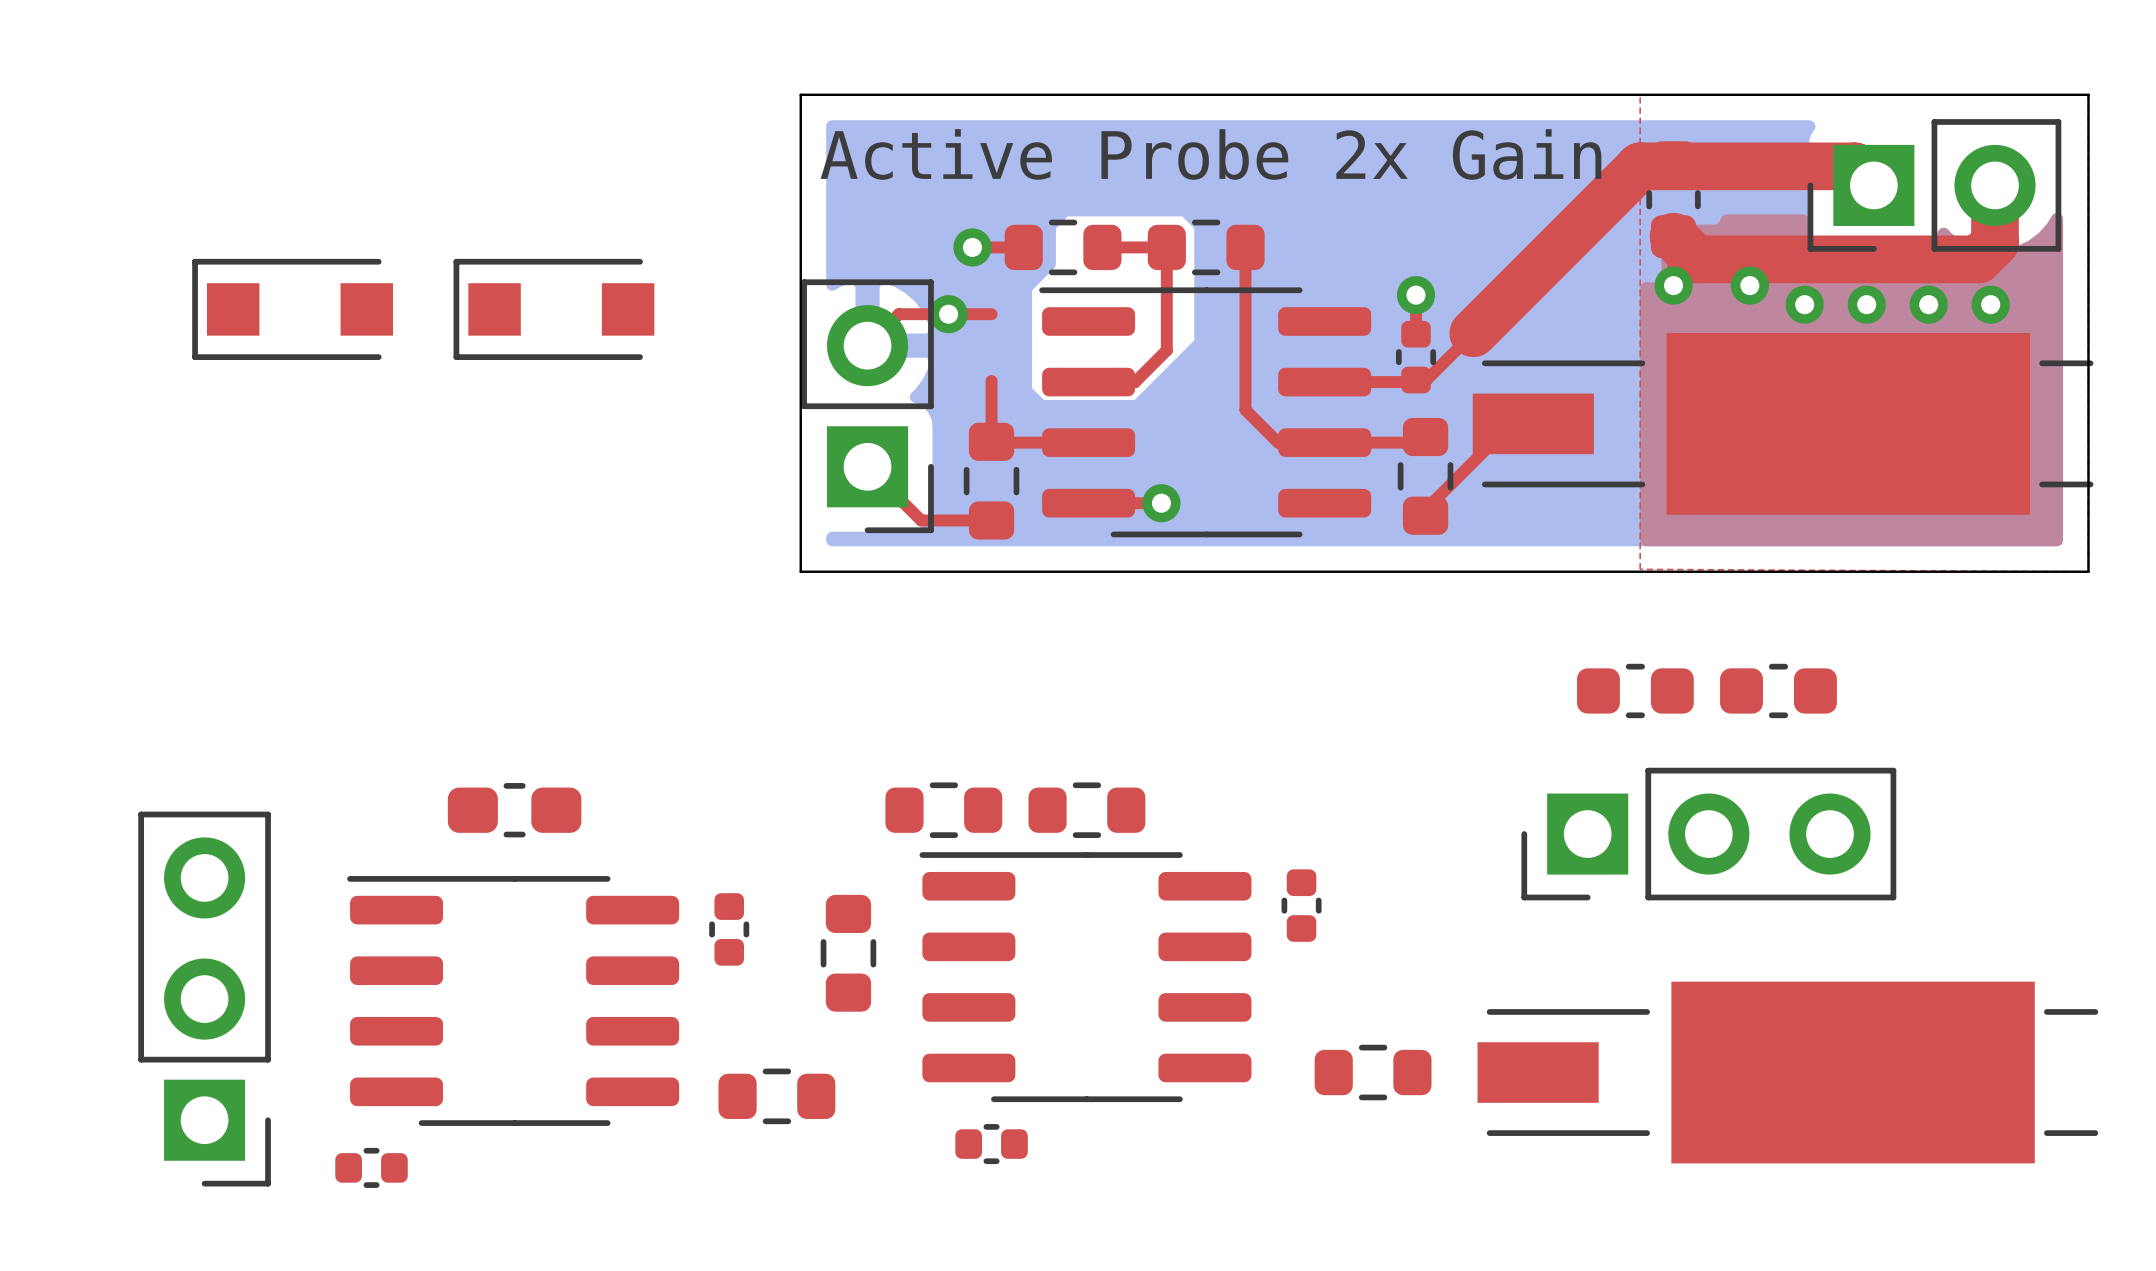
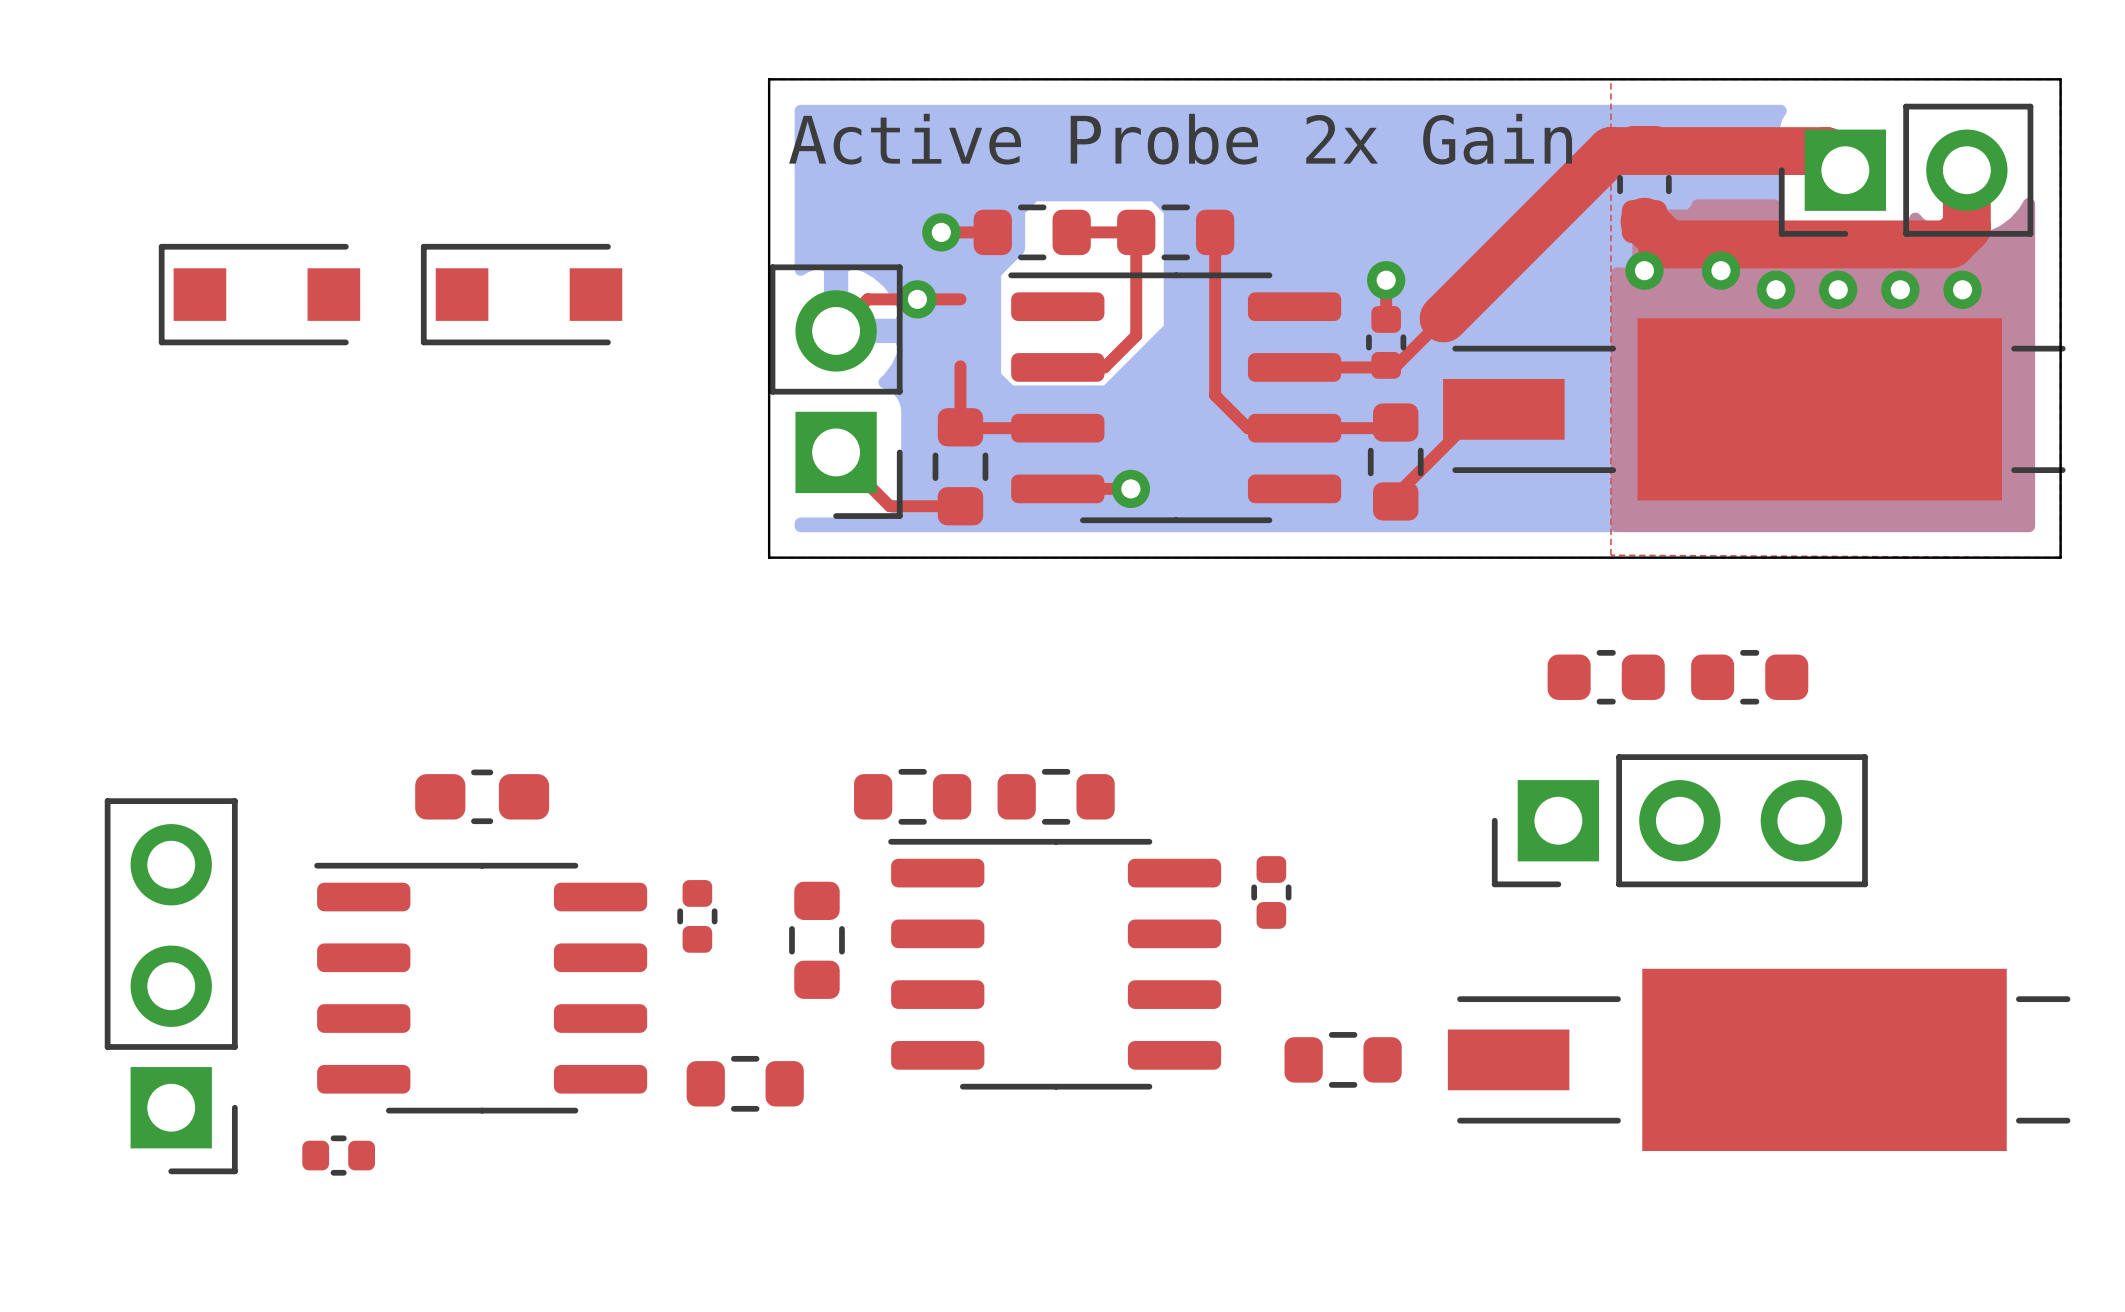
part: (991, 1144) -> none

